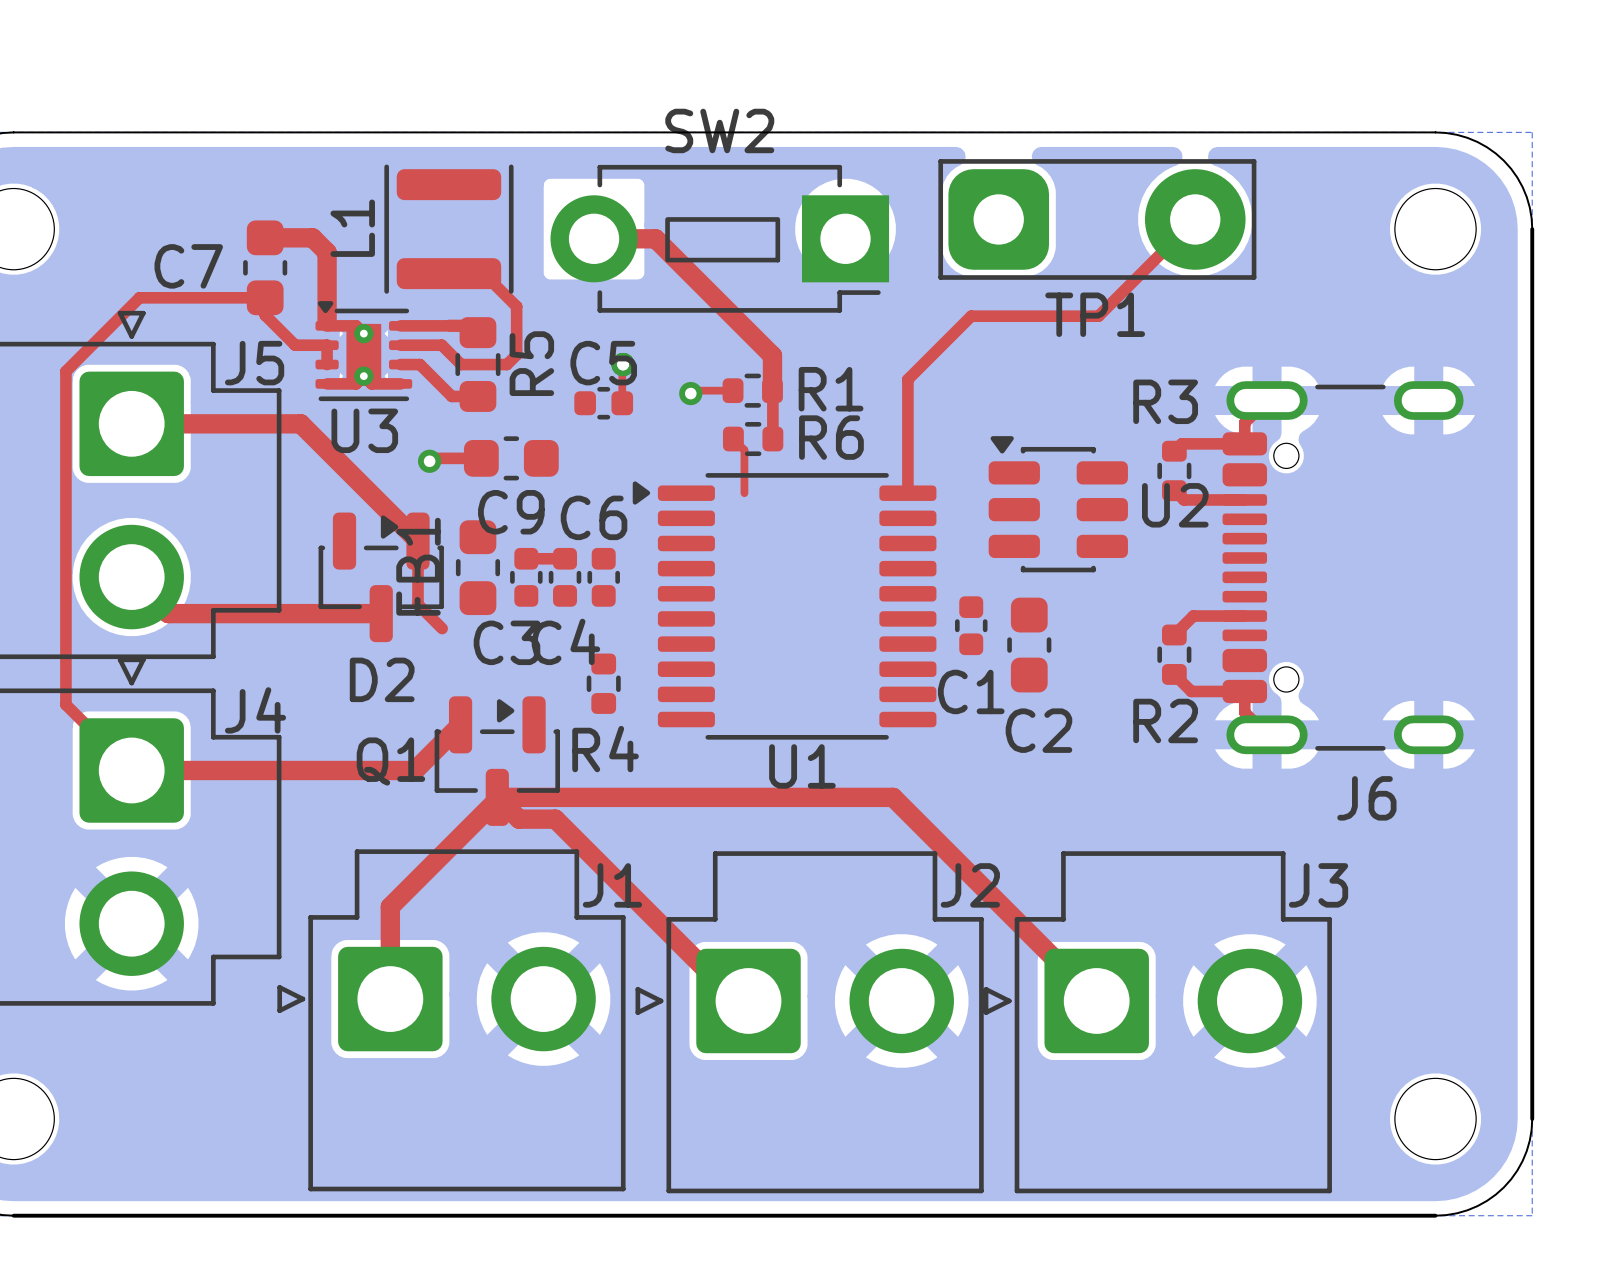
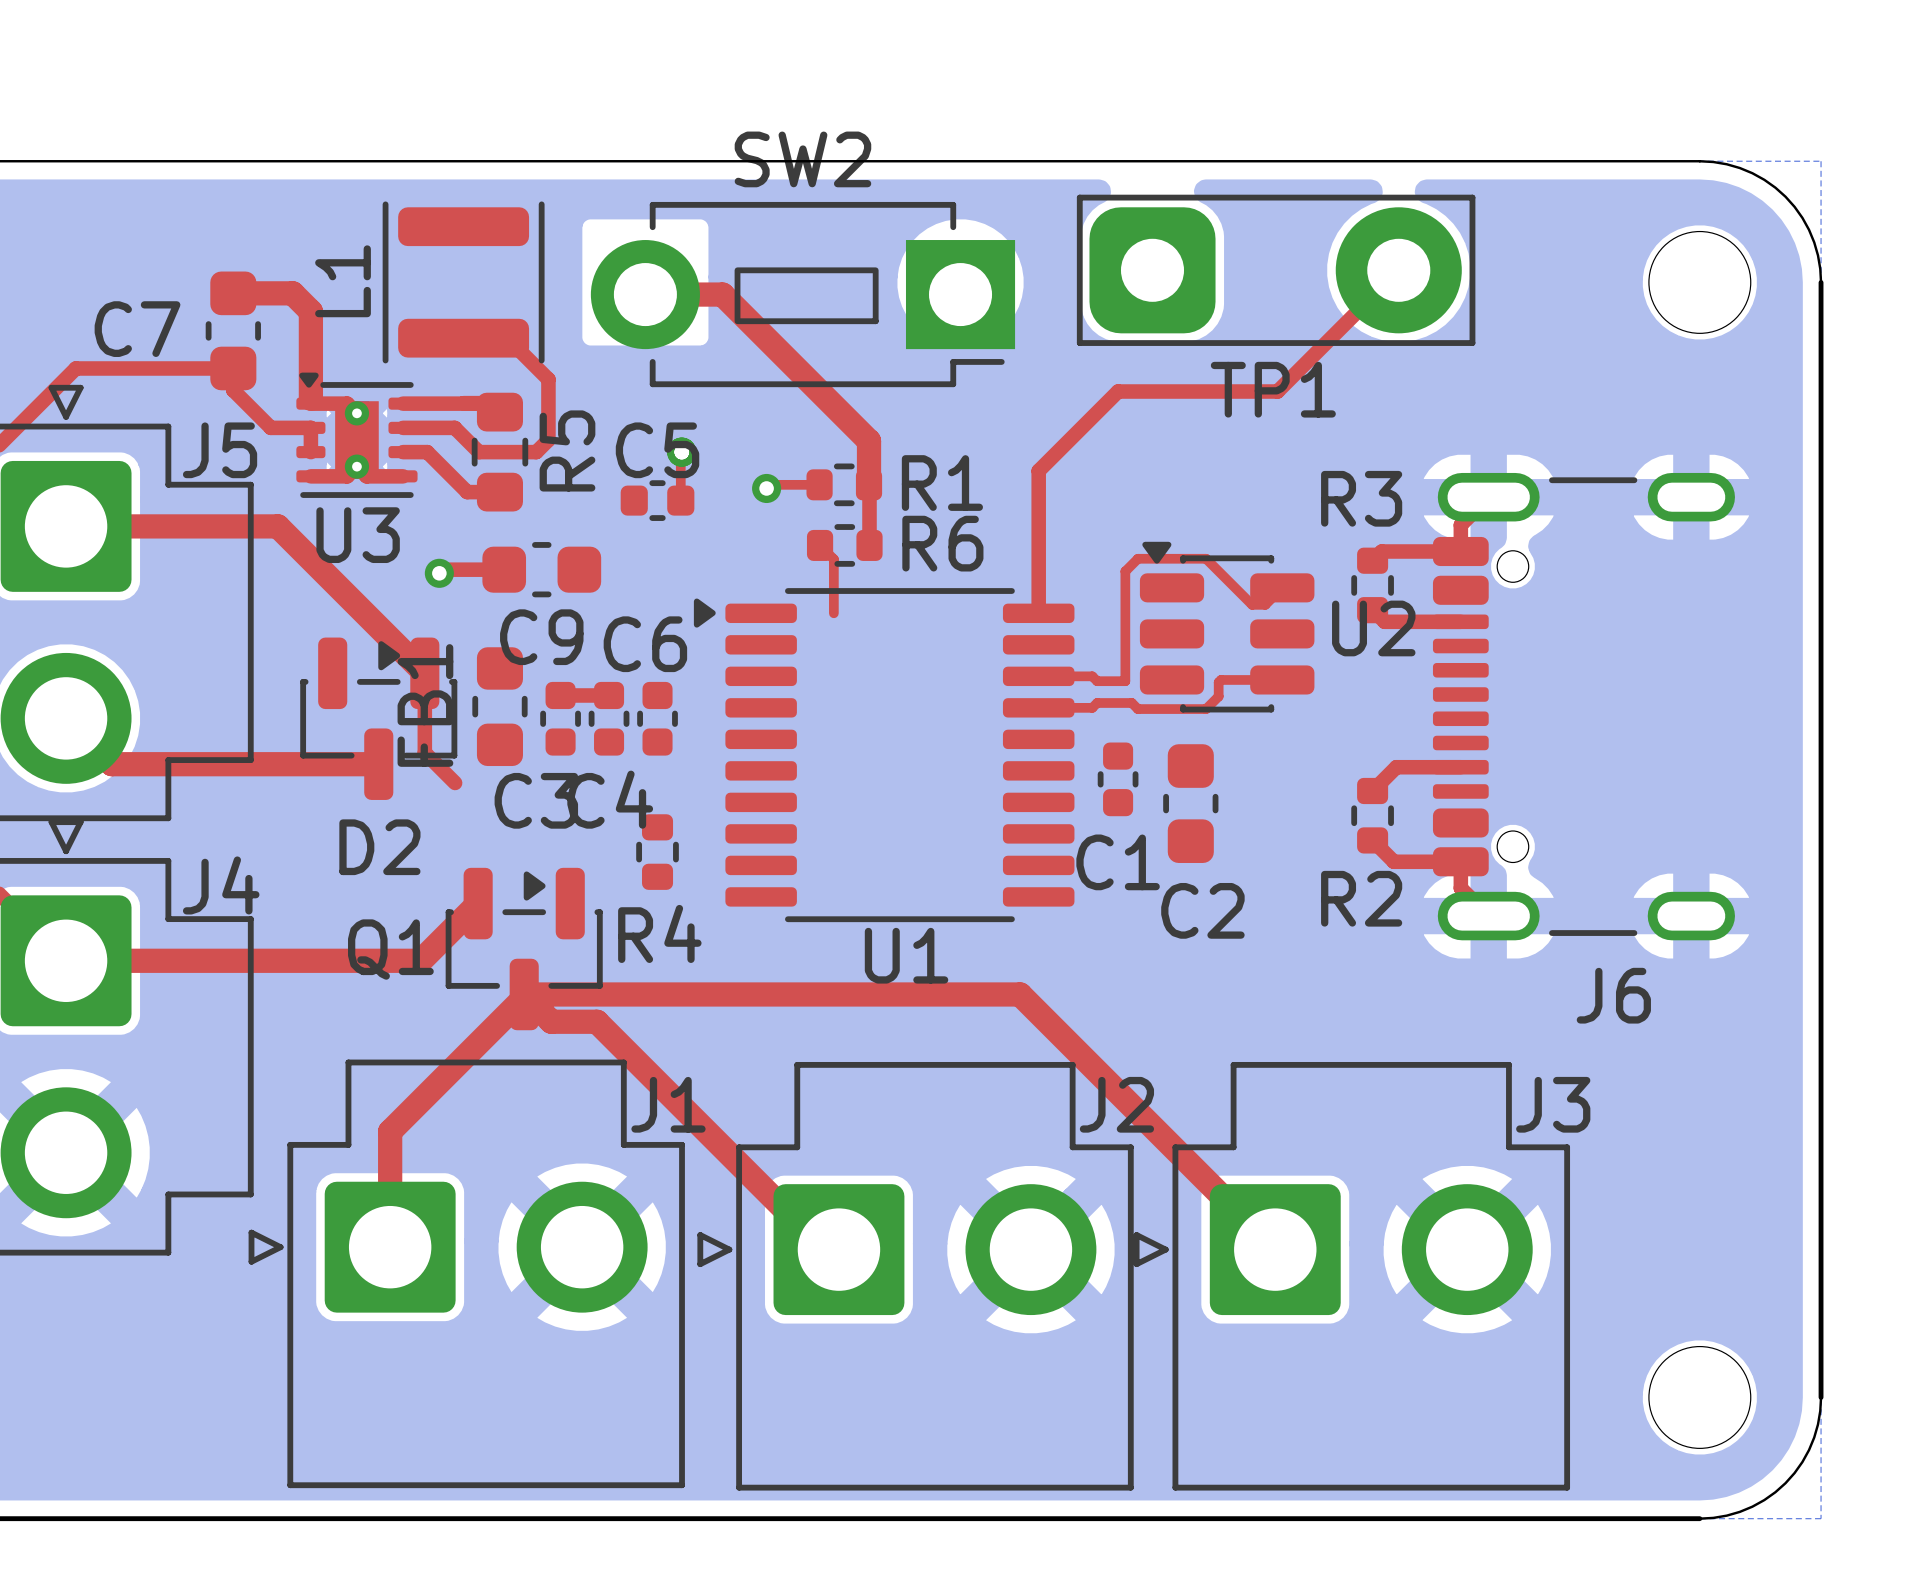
top track: none -> (1282, 587) (1265, 604) (1252, 604) (1206, 558) (1137, 558) (1125, 571) (1125, 681) (1097, 681) (1092, 676) (1038, 676)
top track: none -> (1282, 679) (1221, 679) (1218, 682) (1218, 696) (1206, 709) (1137, 709) (1131, 703) (1097, 703) (1092, 707) (1038, 707)

